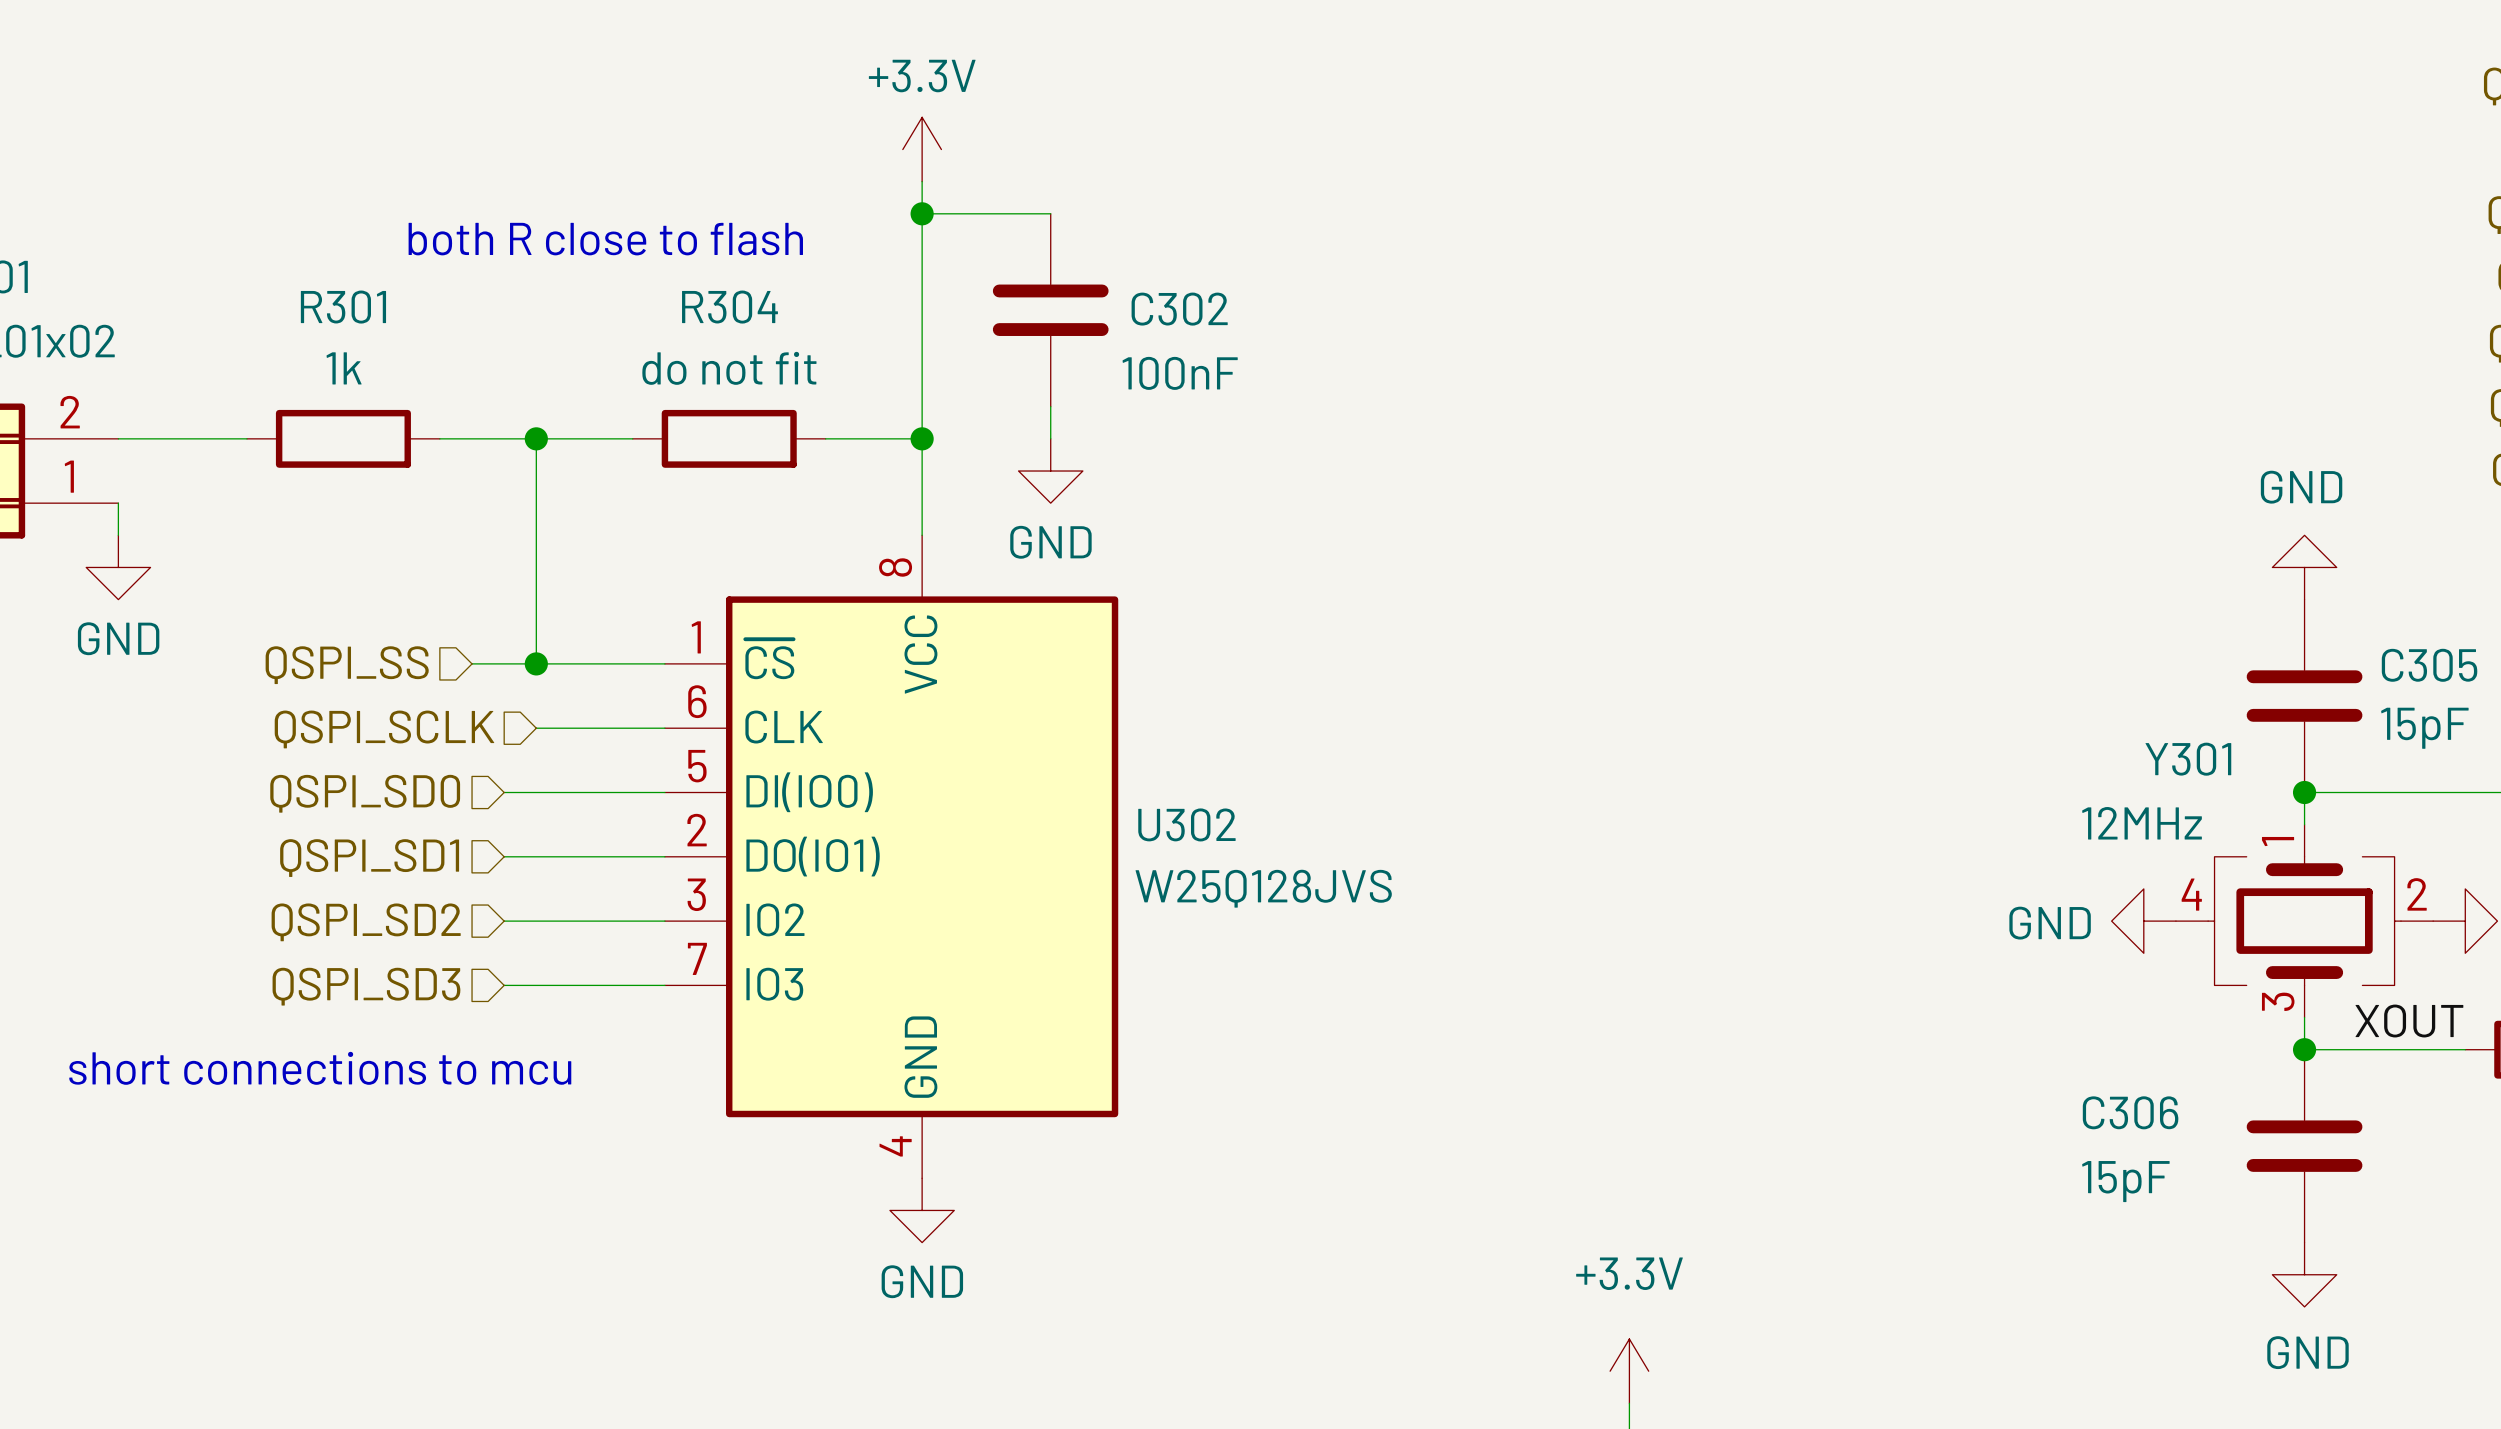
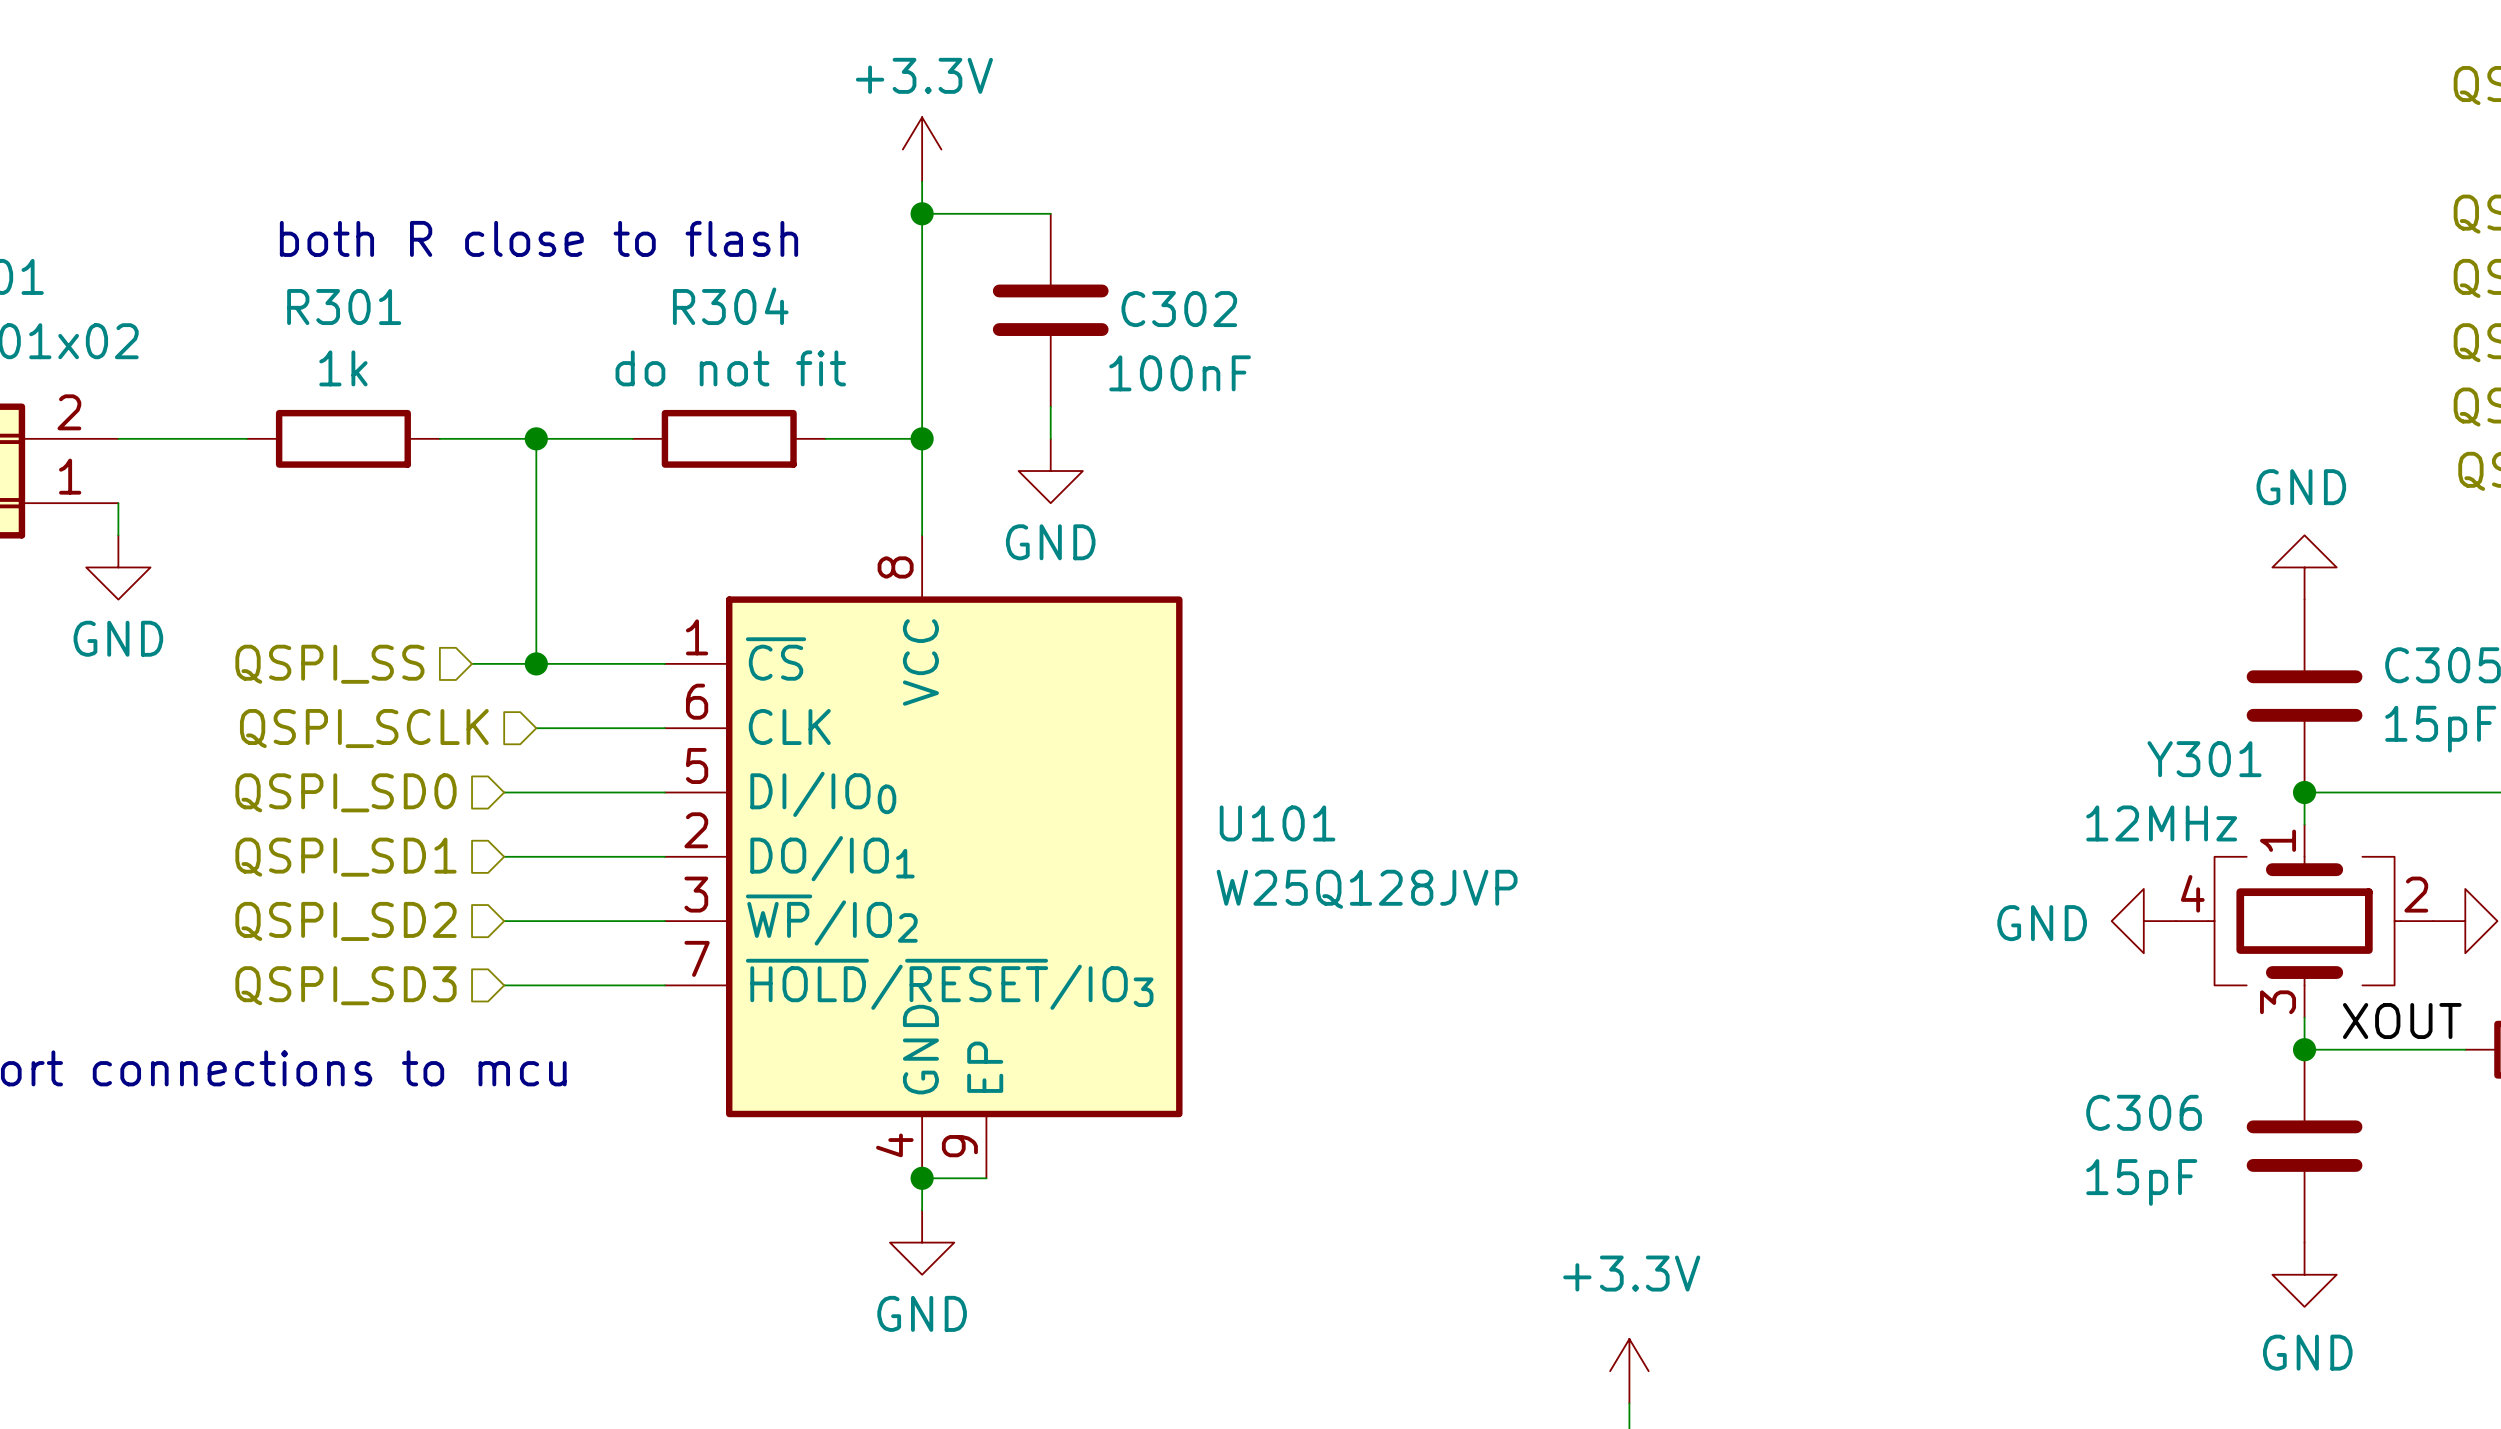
U302: W25Q128JVS (891, 856) -> none
U101: none -> W25Q128JVP (923, 856)
junction: none -> (922, 1178)
wire: none -> (986, 1178) (922, 1178) (922, 1210)
power symbol position: GND (922, 1210) -> GND (922, 1242)

